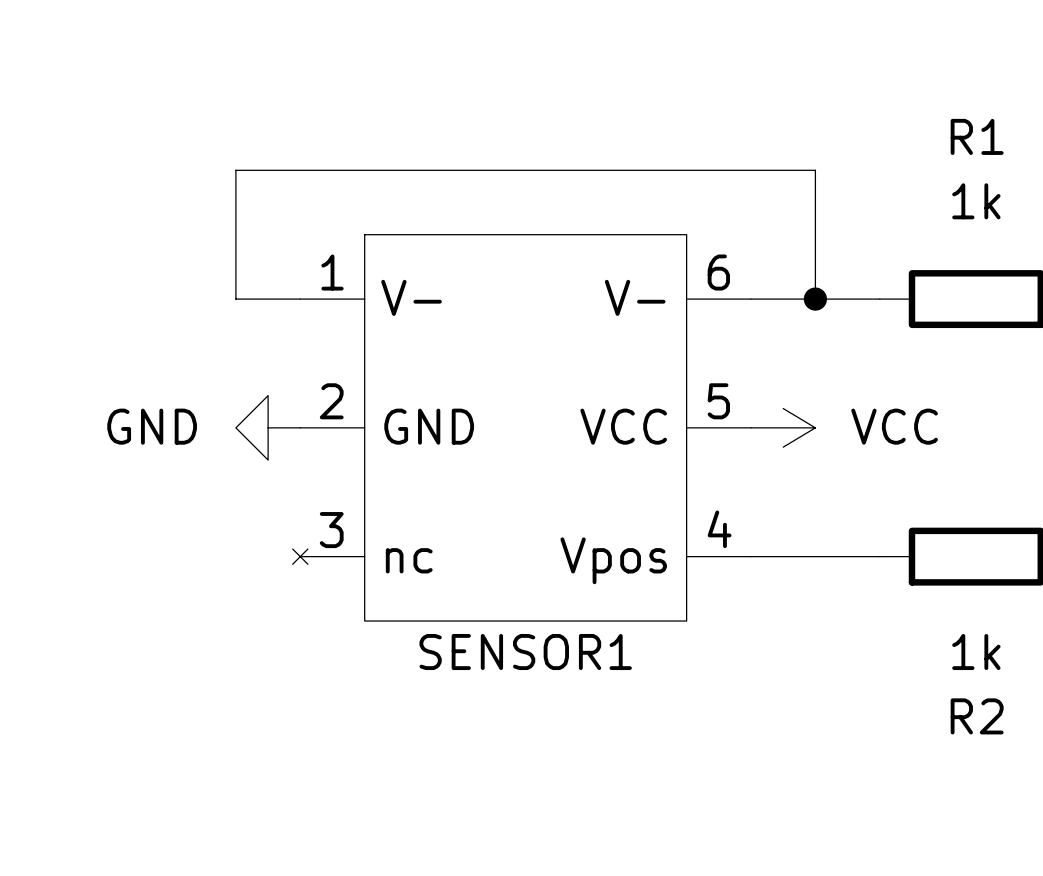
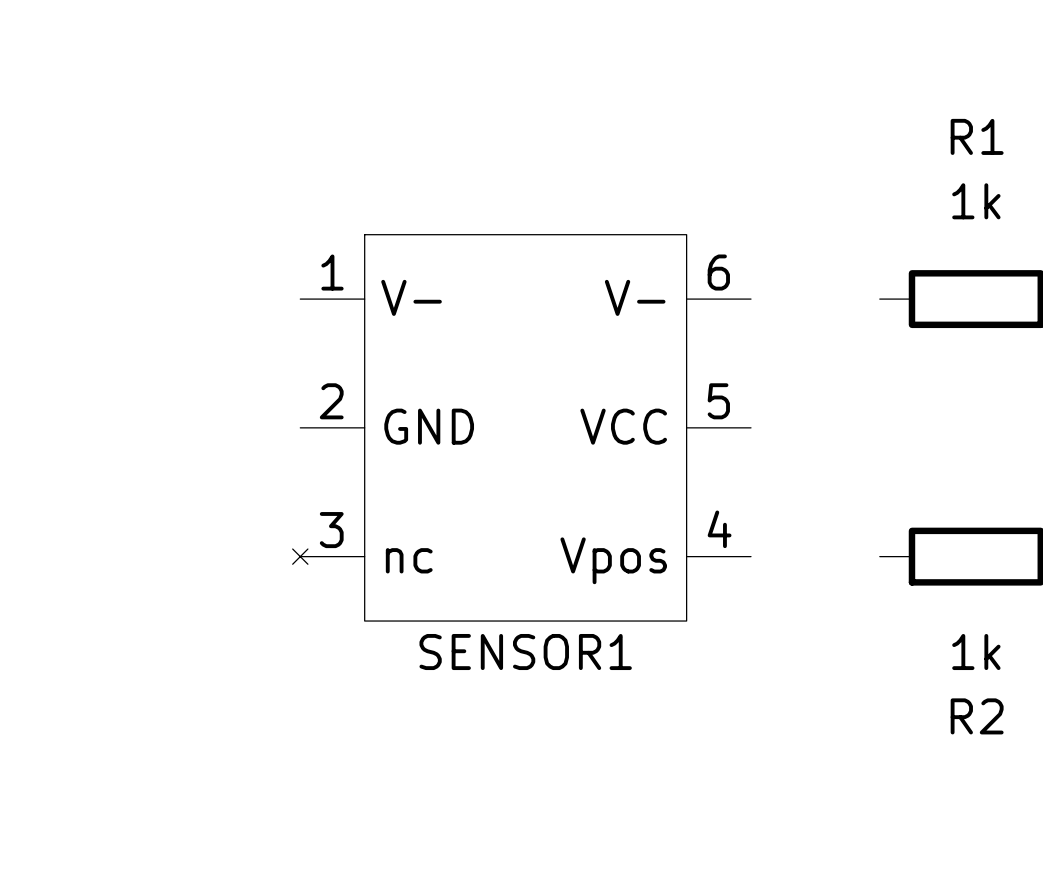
wire: (300, 299) (235, 299) (235, 170) (815, 170) (815, 299) -> none
wire: (751, 299) (879, 299) -> none
junction: (815, 299) -> none
power symbol: GND (268, 427) -> none
power symbol: VCC (783, 427) -> none
wire: (751, 556) (879, 556) -> none

